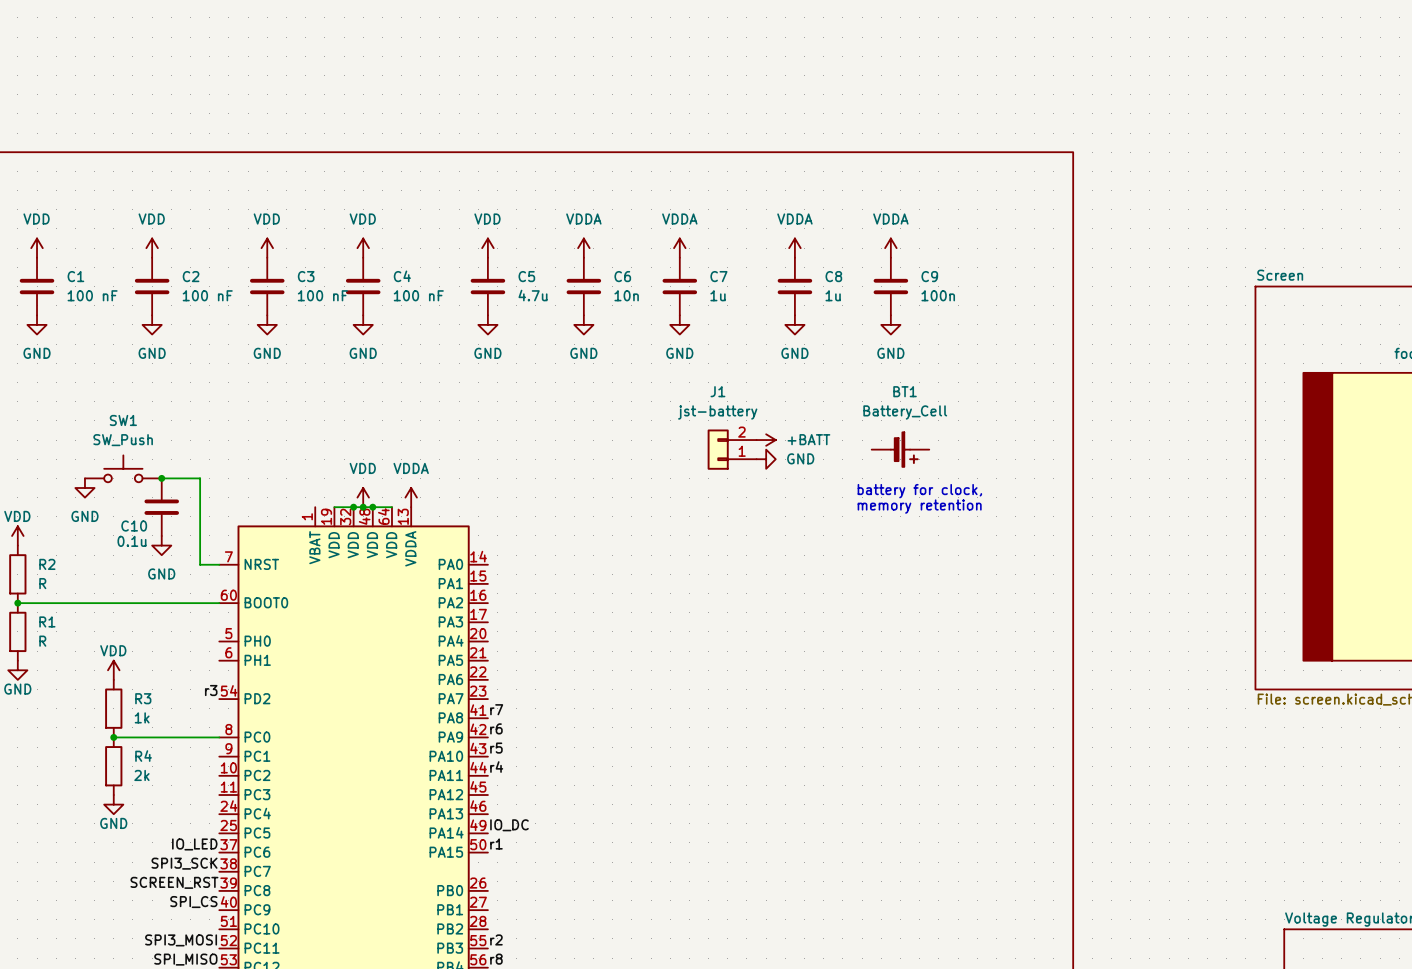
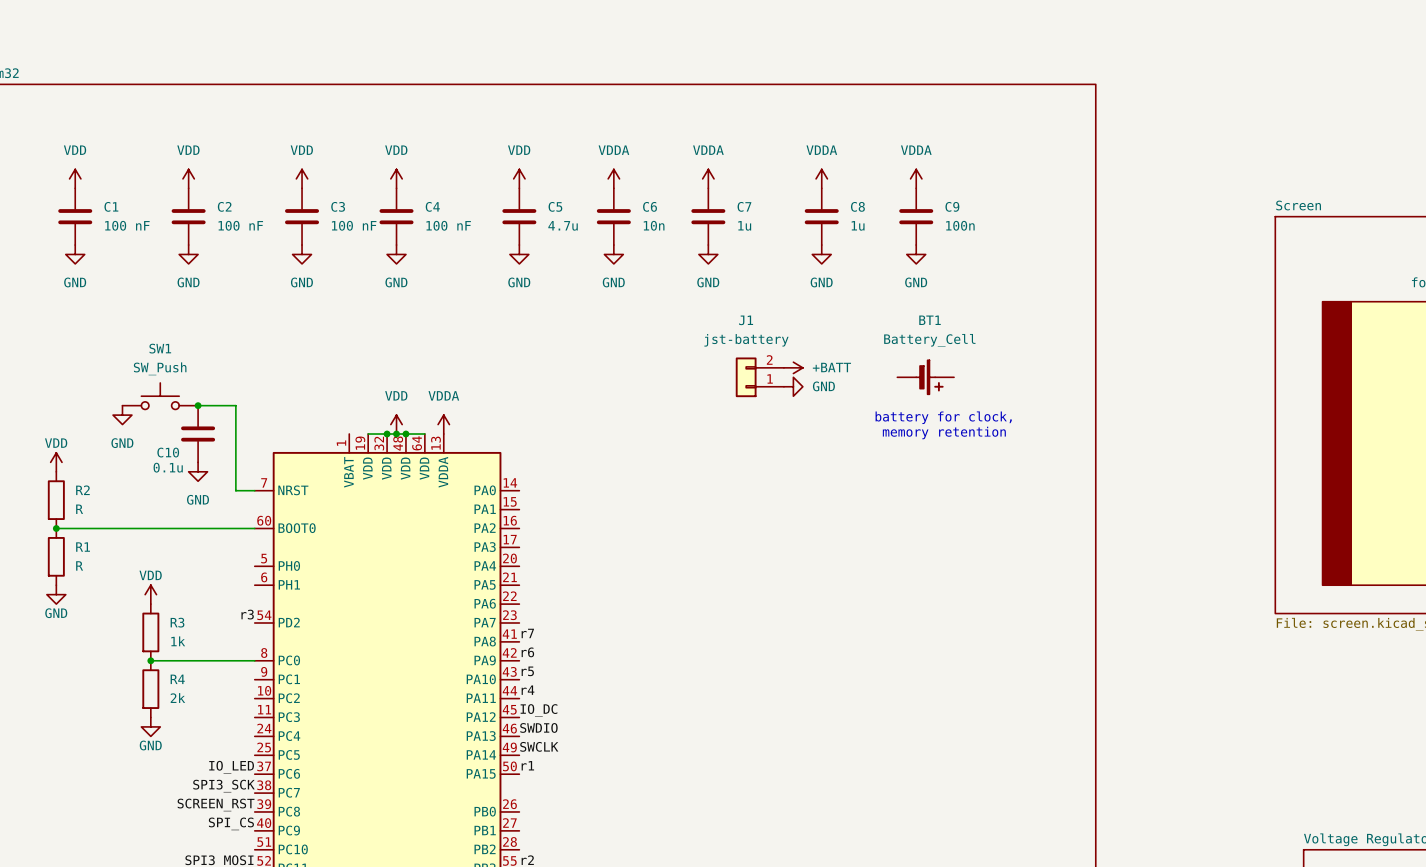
label: none -> IO_DC (539, 710)
label: none -> SWDIO (538, 727)
label: IO_DC (509, 825) -> SWCLK (539, 746)

